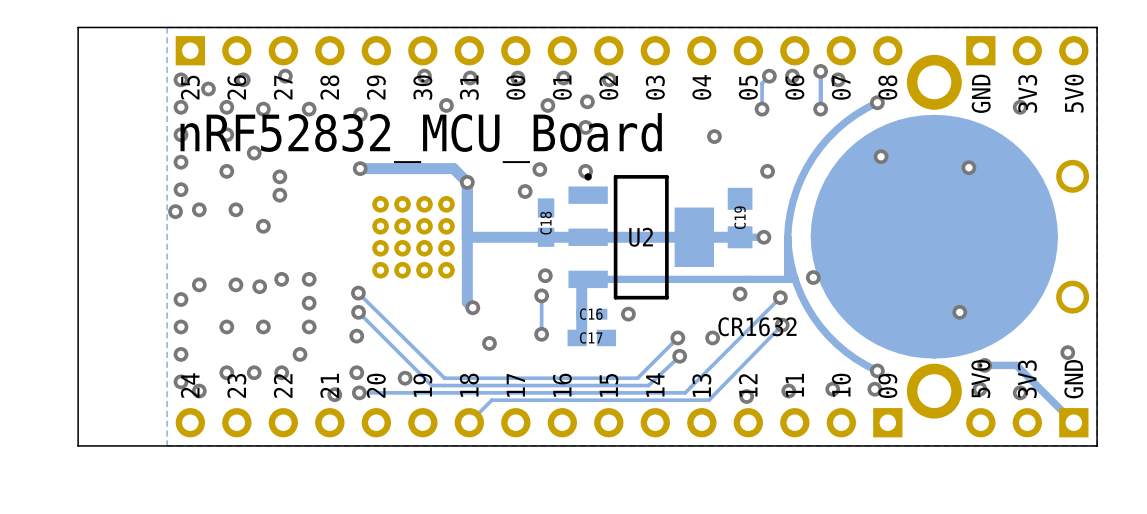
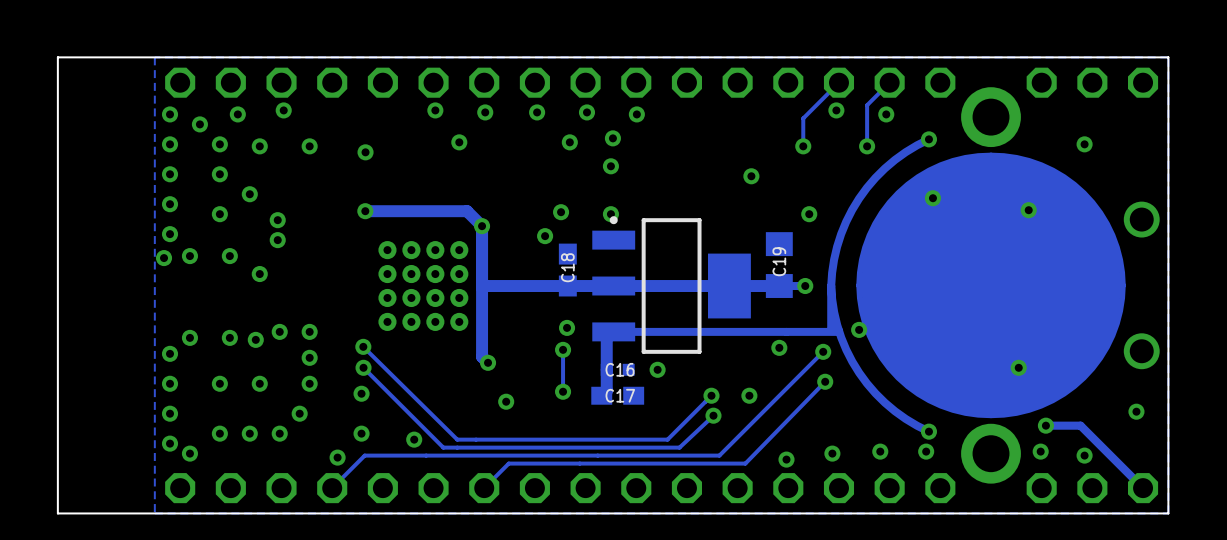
part footprint: [175, 36, 903, 66] -> [165, 67, 956, 98]
part footprint: [966, 36, 1089, 66] -> [1026, 67, 1159, 98]
track: none -> (838, 82) (811, 110)
track: none -> (889, 82) (867, 105)
via: (820, 71) -> none
via: (769, 76) -> none
text: 25 (190, 87) -> none
text: 26 (236, 87) -> none
text: 27 (283, 87) -> none
text: 28 (329, 87) -> none
text: 29 (376, 87) -> none
text: 30 (422, 87) -> none
text: 31 (469, 87) -> none
text: 00 (515, 87) -> none
text: 01 (562, 87) -> none
text: 02 (608, 87) -> none
text: 03 (655, 87) -> none
text: 04 (701, 87) -> none
text: 05 (748, 87) -> none
text: 06 (794, 87) -> none
text: 07 (841, 87) -> none
text: 08 (887, 87) -> none
text: GND (981, 93) -> none
text: 3V3 (1027, 93) -> none
text: 5V0 (1074, 93) -> none
text: nRF52832_MCU_Board (421, 138) -> none
U2 name: U2 (641, 237) -> none
text: CR1632 (757, 326) -> none
text: 5V0 (980, 379) -> none
text: 3V3 (1027, 379) -> none
text: GND (1073, 379) -> none
text: 24 (190, 385) -> none
text: 23 (236, 385) -> none
text: 22 (283, 385) -> none
text: 21 (329, 385) -> none
text: 20 (376, 385) -> none
text: 19 (422, 385) -> none
text: 18 (469, 385) -> none
text: 17 (515, 385) -> none
text: 16 (562, 385) -> none
text: 15 (609, 385) -> none
text: 14 (655, 385) -> none
text: 13 (701, 385) -> none
text: 12 (748, 385) -> none
text: 11 (794, 385) -> none
text: 10 (841, 385) -> none
text: 09 (887, 385) -> none
track: none -> (364, 455) (332, 488)
via: (359, 392) -> none
part footprint: [175, 408, 903, 438] -> [165, 473, 956, 504]
part footprint: [966, 408, 1089, 438] -> [1026, 473, 1159, 504]

